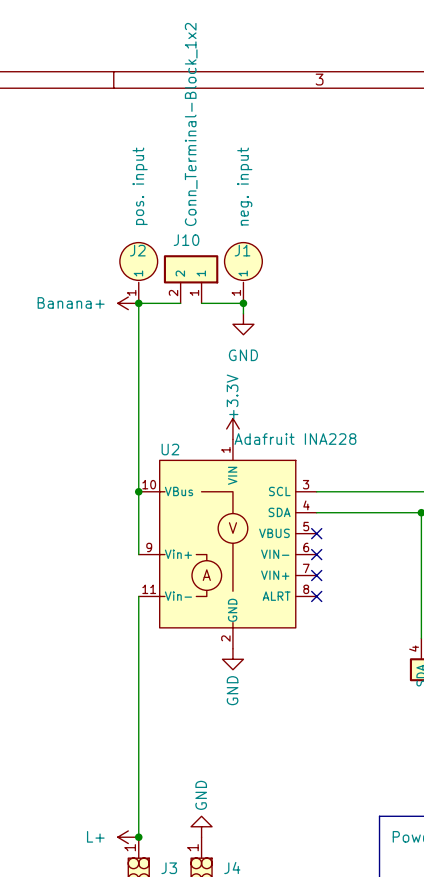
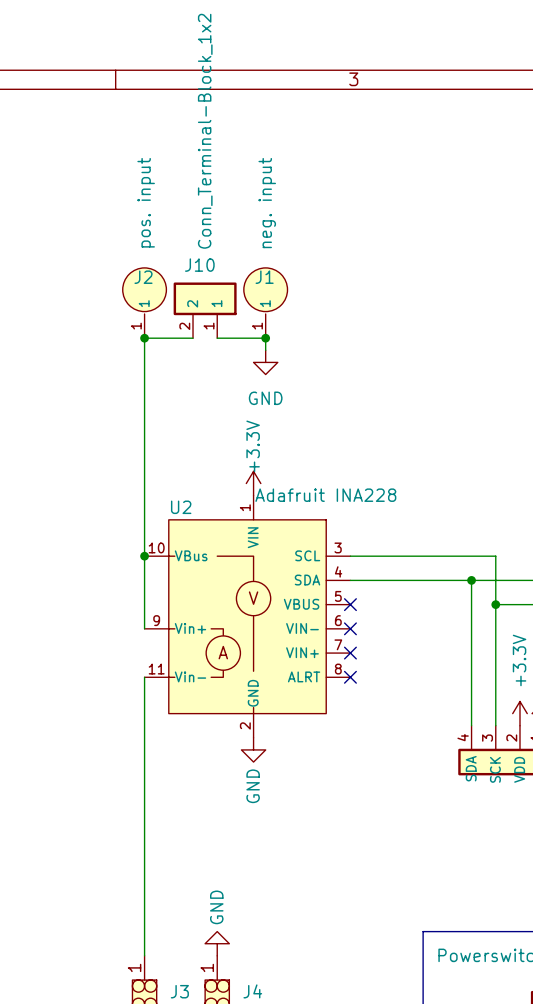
power symbol: Banana+ (128, 303) -> none
power symbol: L+ (128, 837) -> none
junction: (138, 837) -> none

